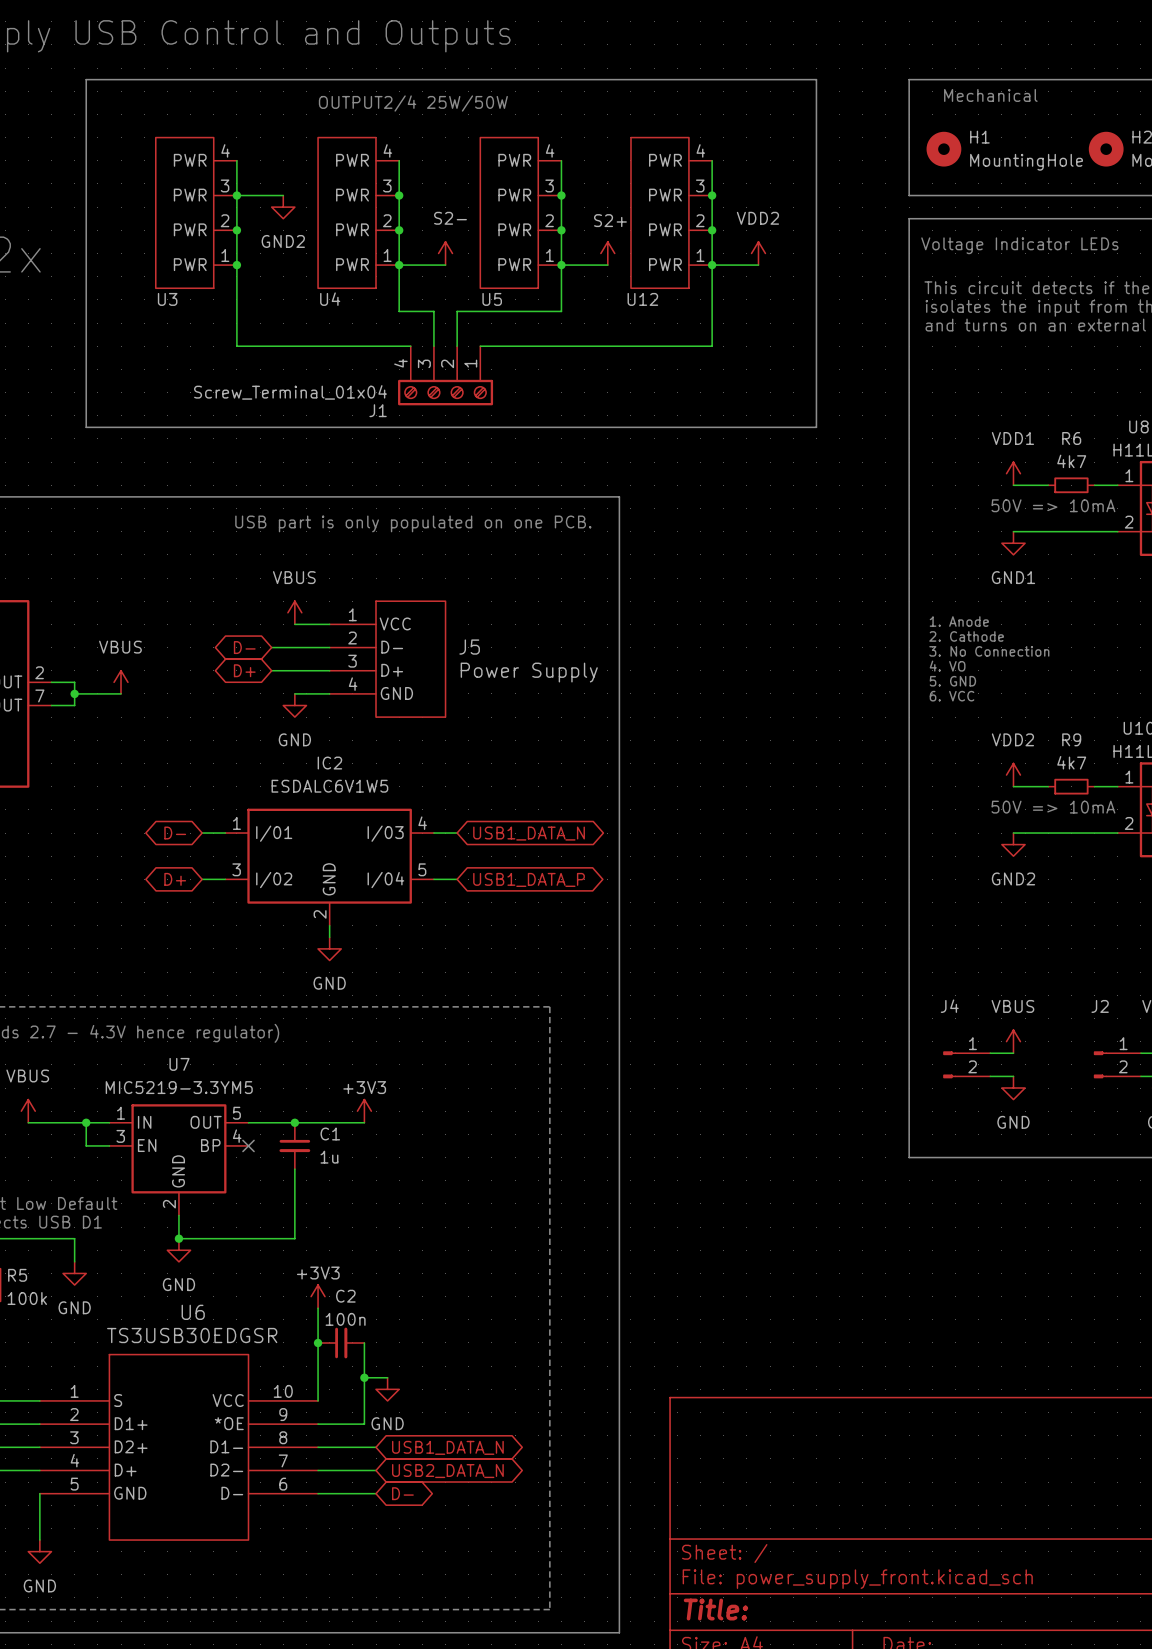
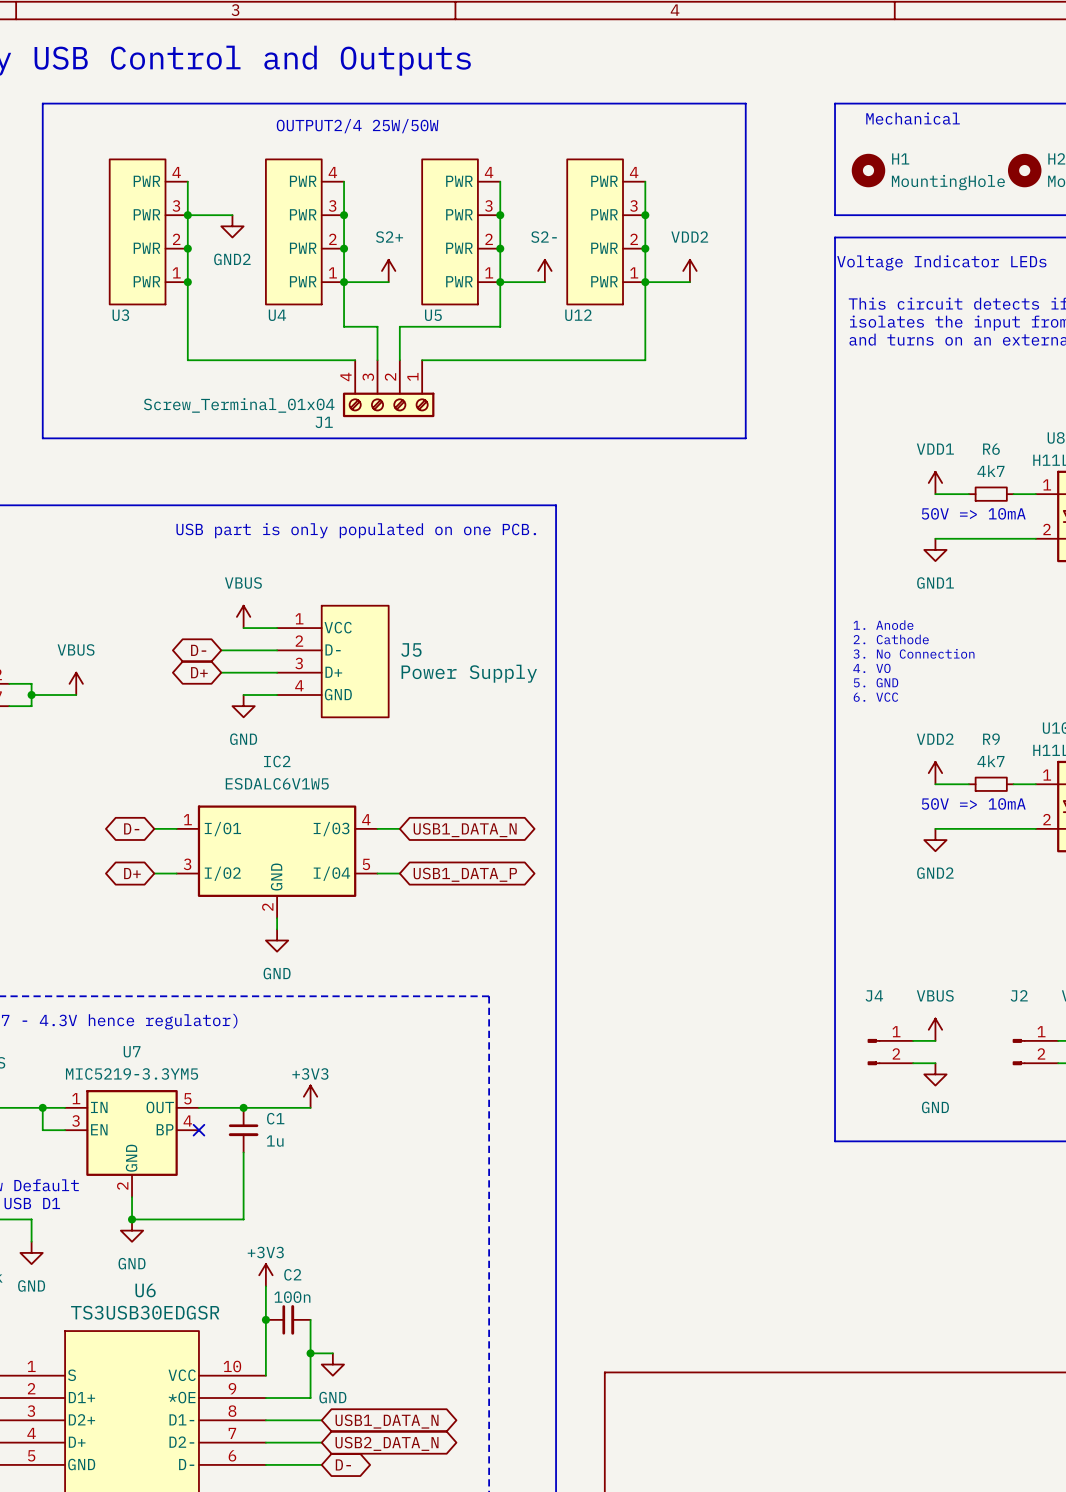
power symbol: S2- (445, 253) -> S2+ (388, 270)
power symbol: S2+ (607, 253) -> S2- (544, 270)

